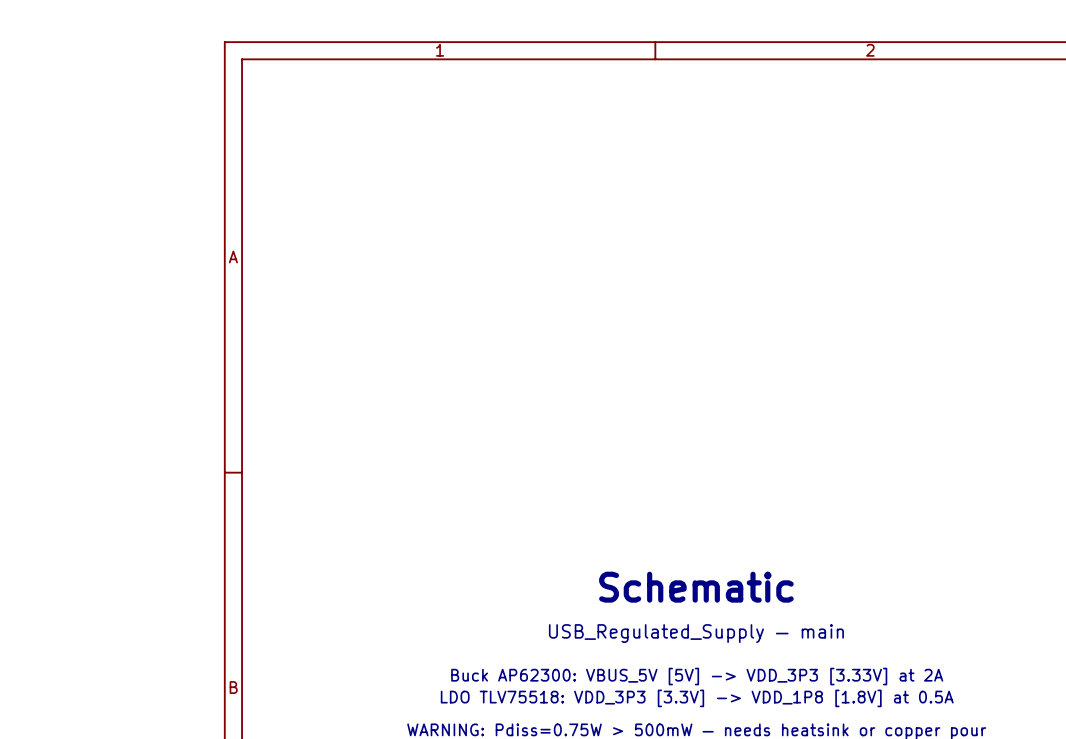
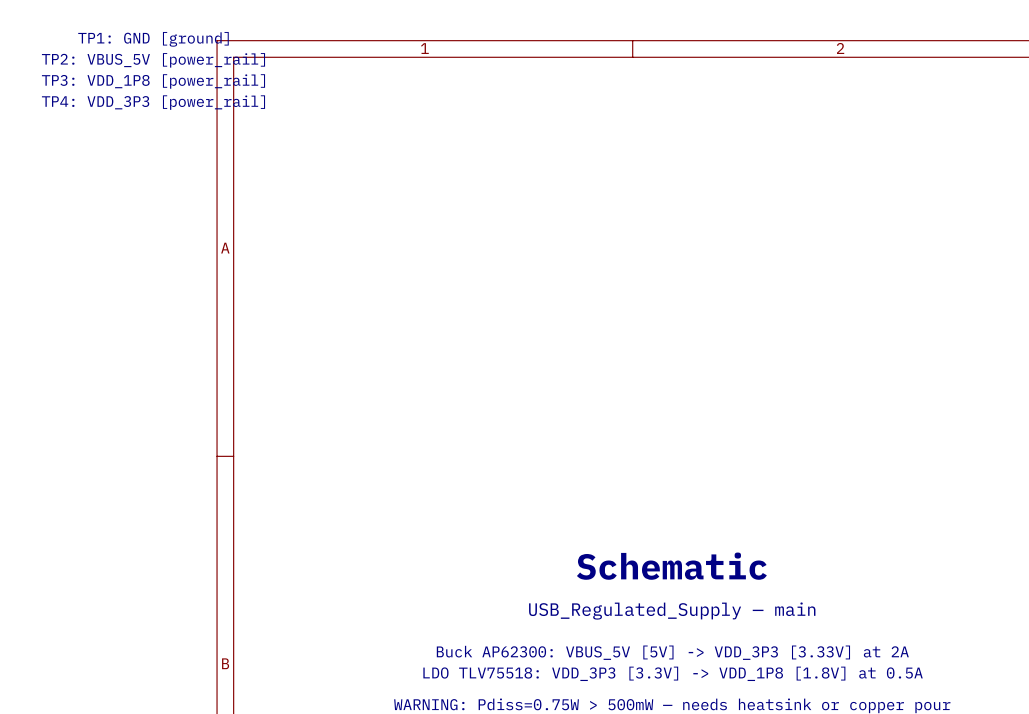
text: none -> TP1: GND [ground] (153, 39)
text: none -> TP2: VBUS_5V [power_rail] (153, 60)
text: none -> TP3: VDD_1P8 [power_rail] (153, 81)
text: none -> TP4: VDD_3P3 [power_rail] (153, 102)

